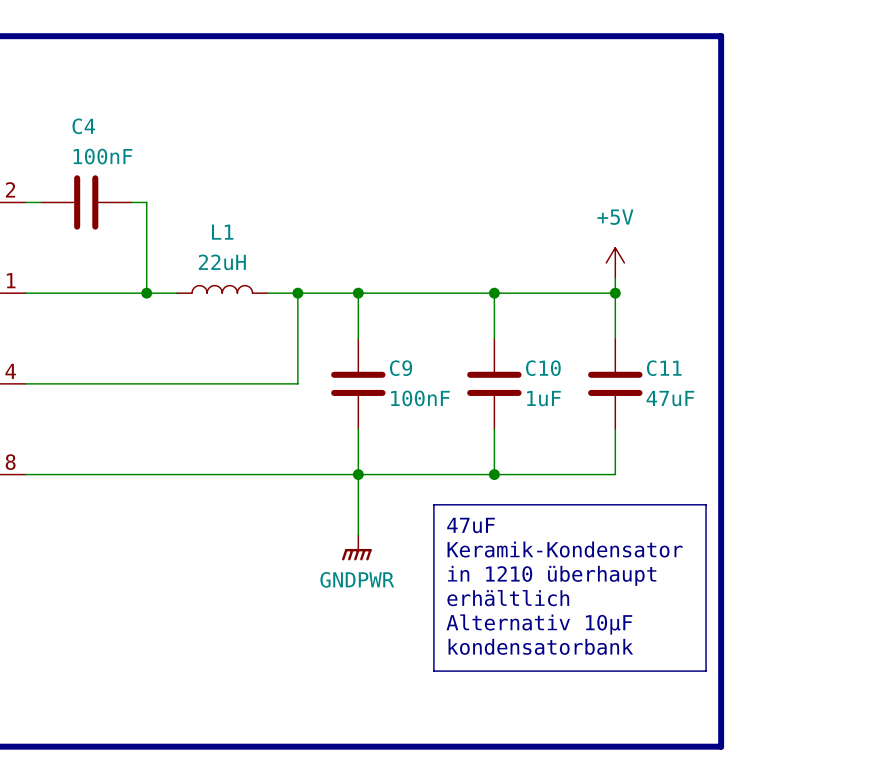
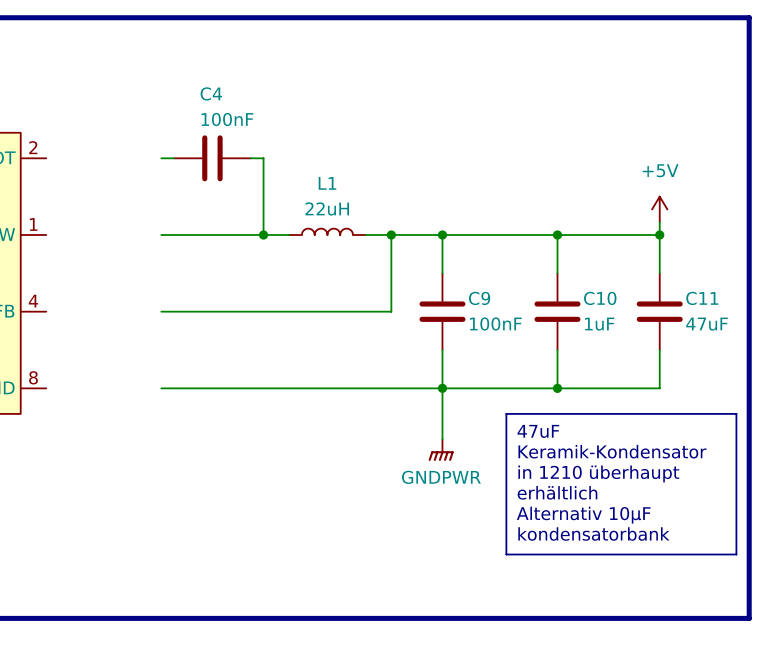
line: (721, 36) (721, 746) -> (634, 17) (749, 17) (749, 618) (634, 618)
wire: (25, 202) (40, 202) -> (161, 158) (174, 158)
C4 position: (86, 202) -> (212, 158)
wire: (131, 202) (146, 202) (146, 293) -> (250, 158) (263, 158) (263, 234)
power symbol position: +5V (615, 262) -> +5V (659, 209)
wire: (615, 278) (615, 338) -> (659, 222) (659, 273)
L1 position: (222, 289) -> (327, 231)
wire: (25, 293) (161, 293) -> none
junction: (146, 293) -> none
wire: (297, 293) (297, 383) -> (391, 234) (391, 311) (276, 311)
junction position: (297, 293) -> (263, 234)
wire: (312, 293) (403, 293) -> (174, 234) (250, 234)
wire: (358, 293) (358, 338) -> (557, 234) (557, 273)
junction: (358, 293) -> none
junction: none -> (391, 234)
wire: none -> (544, 234) (659, 234)
junction position: (615, 293) -> (557, 234)
junction: none -> (659, 234)
C10 name: C10 (543, 368) -> C9 (479, 298)
wire: (25, 383) (161, 383) -> none
C9: 100nF (358, 383) -> none
C11 position: (615, 383) -> (659, 311)
C10: none -> 1uF (557, 311)
C10 value: 1uF (543, 398) -> 100nF (495, 323)
wire: (358, 429) (358, 535) -> none
wire: (615, 429) (615, 474) -> (659, 350) (659, 388) (544, 388)
wire: none -> (557, 350) (557, 388)
wire: (25, 474) (161, 474) -> none
junction: (358, 474) -> none
wire: none -> (442, 388) (442, 439)
junction: none -> (557, 388)
line: (569, 504) (433, 504) (433, 671) (569, 671) -> (506, 413) (506, 554)
line: (706, 504) (706, 671) -> (621, 413) (736, 413) (736, 554) (621, 554)
text position: 47uF (471, 525) -> 47uF (538, 431)
power symbol position: GNDPWR (356, 547) -> GNDPWR (441, 450)
text position: Keramik-Kondensator (565, 549) -> Keramik-Kondensator (612, 451)
text position: in 1210 überhaupt (552, 575) -> in 1210 überhaupt (598, 473)
text position: erhältlich (508, 598) -> erhältlich (557, 492)
text position: Alternativ 10µF (539, 624) -> Alternativ 10µF (583, 515)
text position: kondensatorbank (540, 646) -> kondensatorbank (593, 534)

